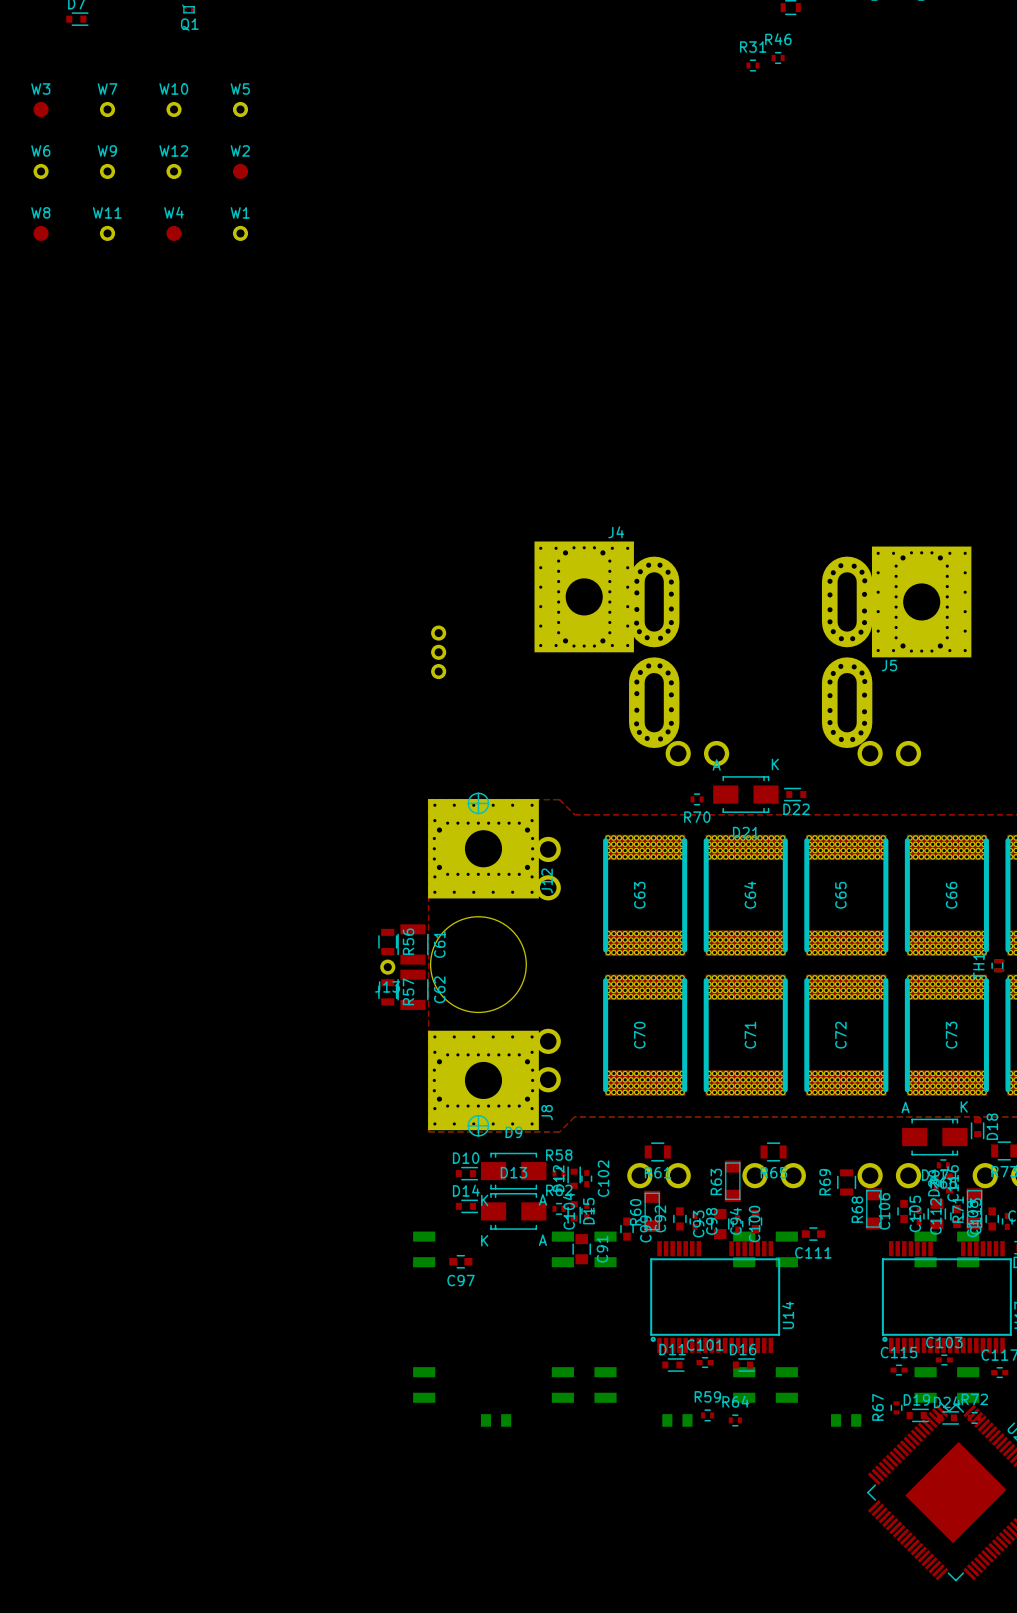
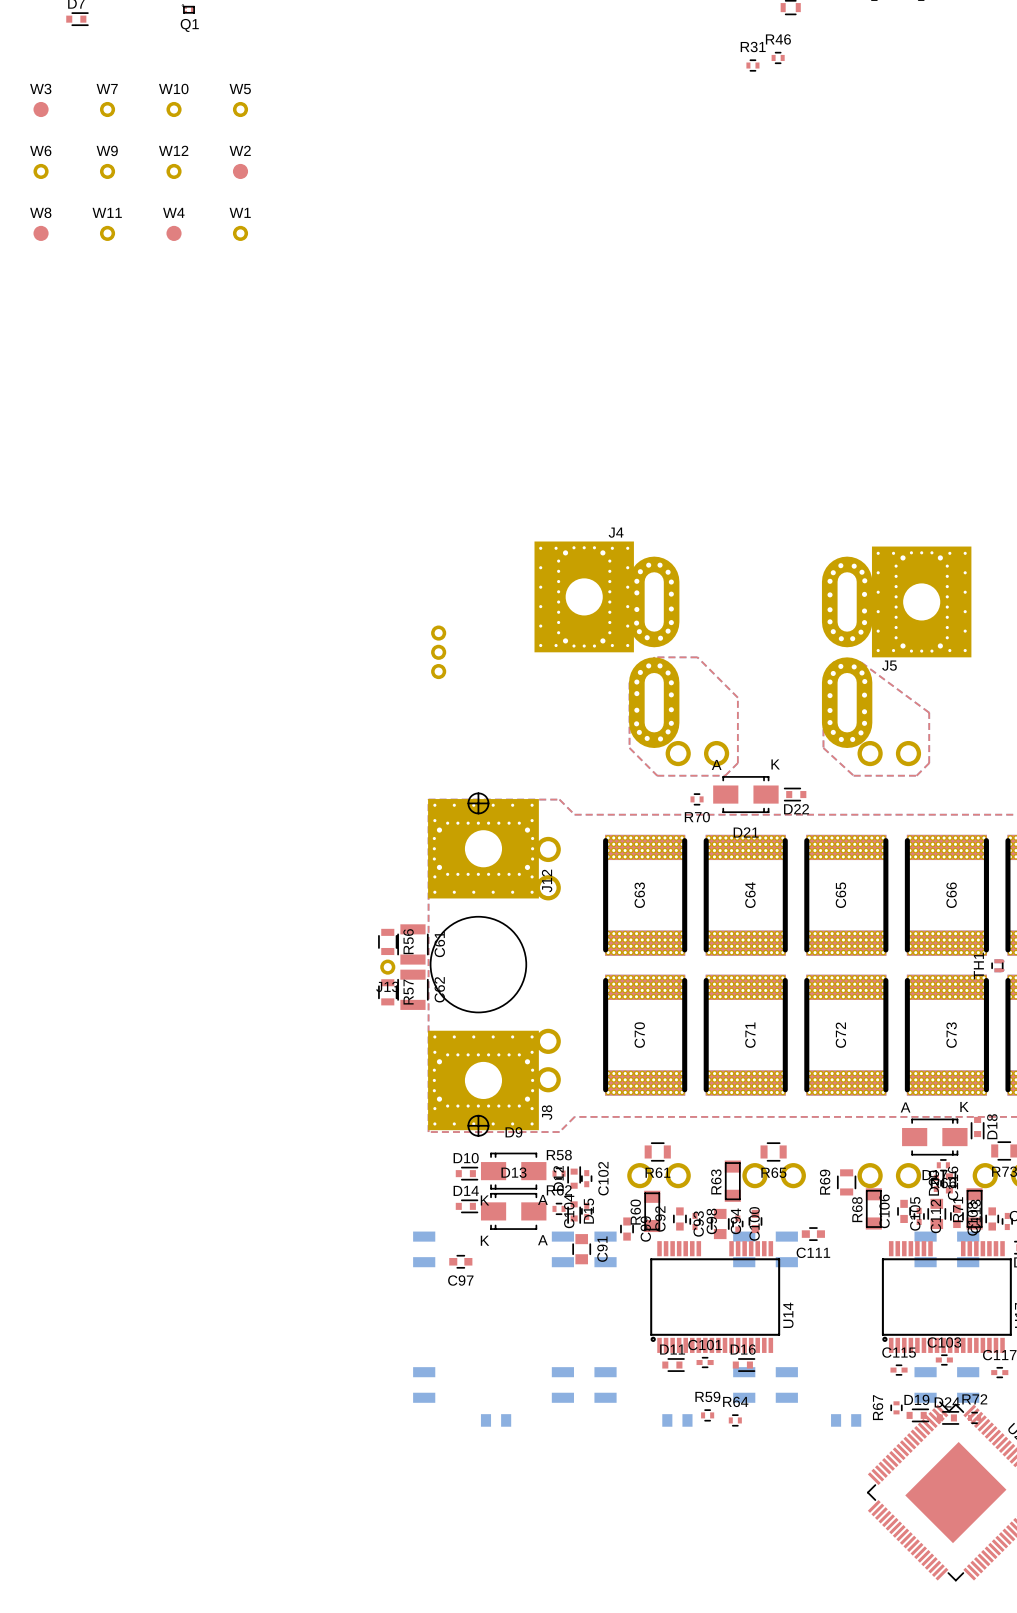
top zone outline: none -> (654, 657) (697, 657) (737, 697) (737, 763) (725, 775) (657, 775) (629, 748) (629, 682) (654, 657)
top zone outline: none -> (833, 662) (861, 662) (929, 712) (929, 763) (916, 775) (853, 775) (823, 748) (823, 685) (833, 662)

